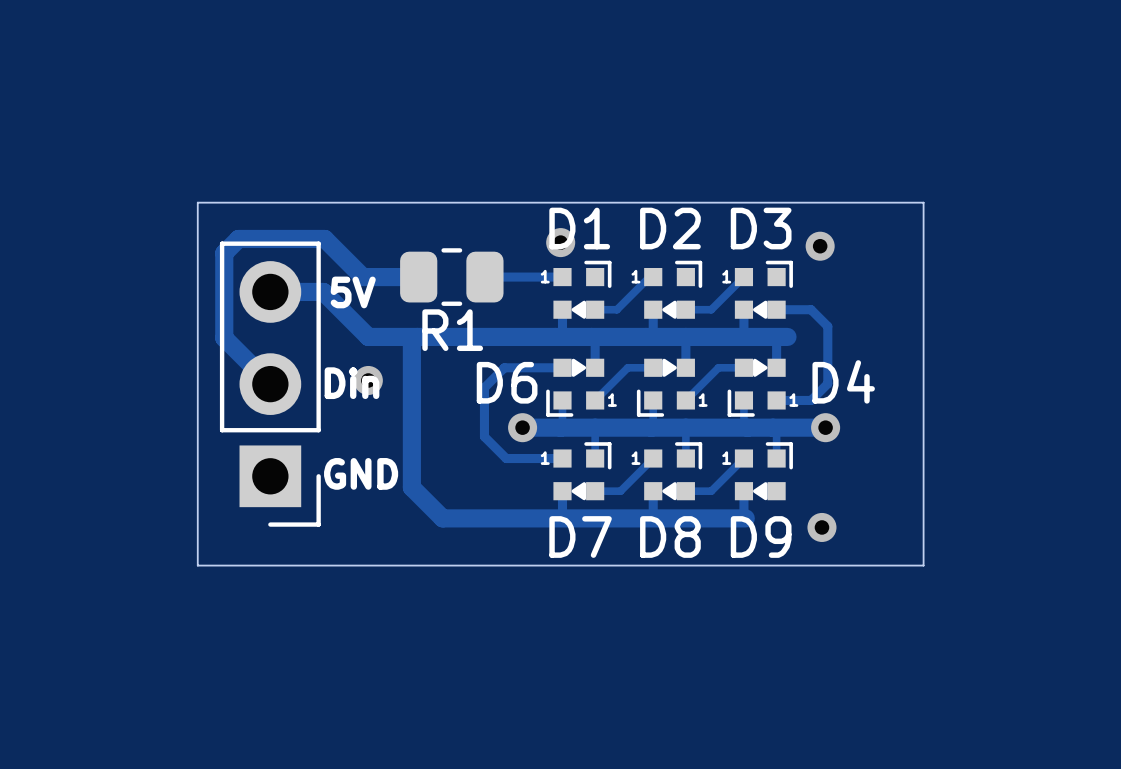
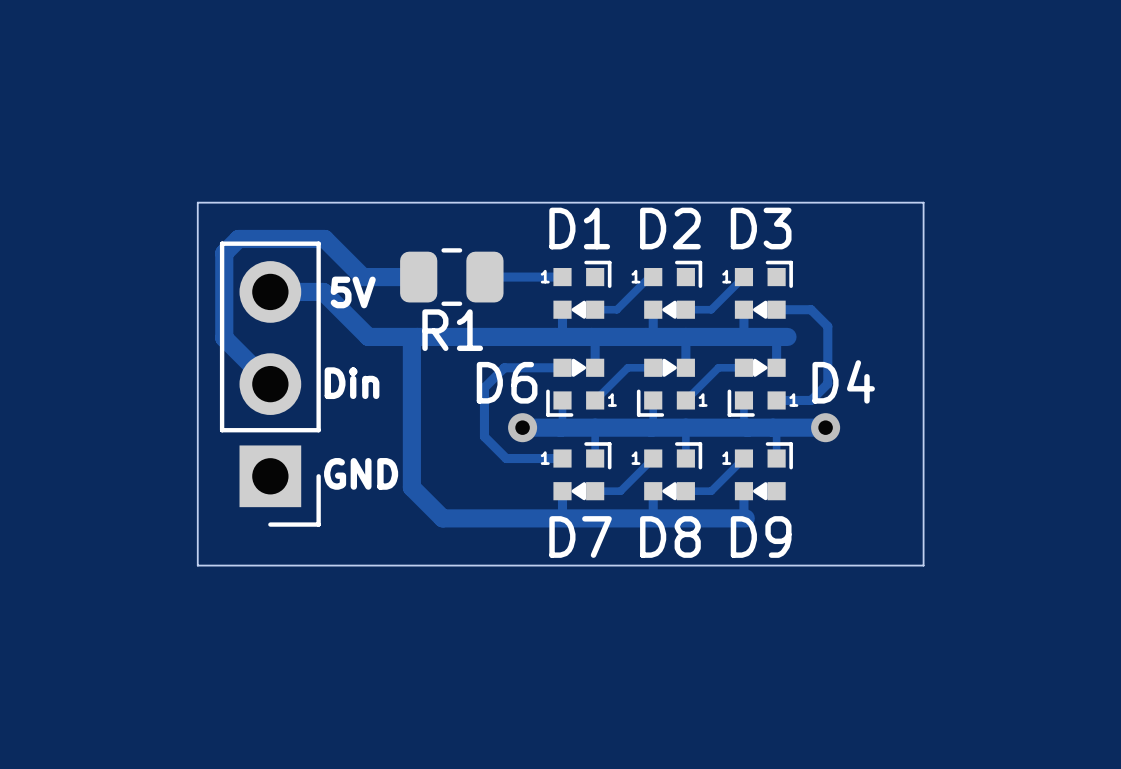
via: (560, 242) -> none
via: (820, 246) -> none
via: (368, 380) -> none
via: (821, 527) -> none

